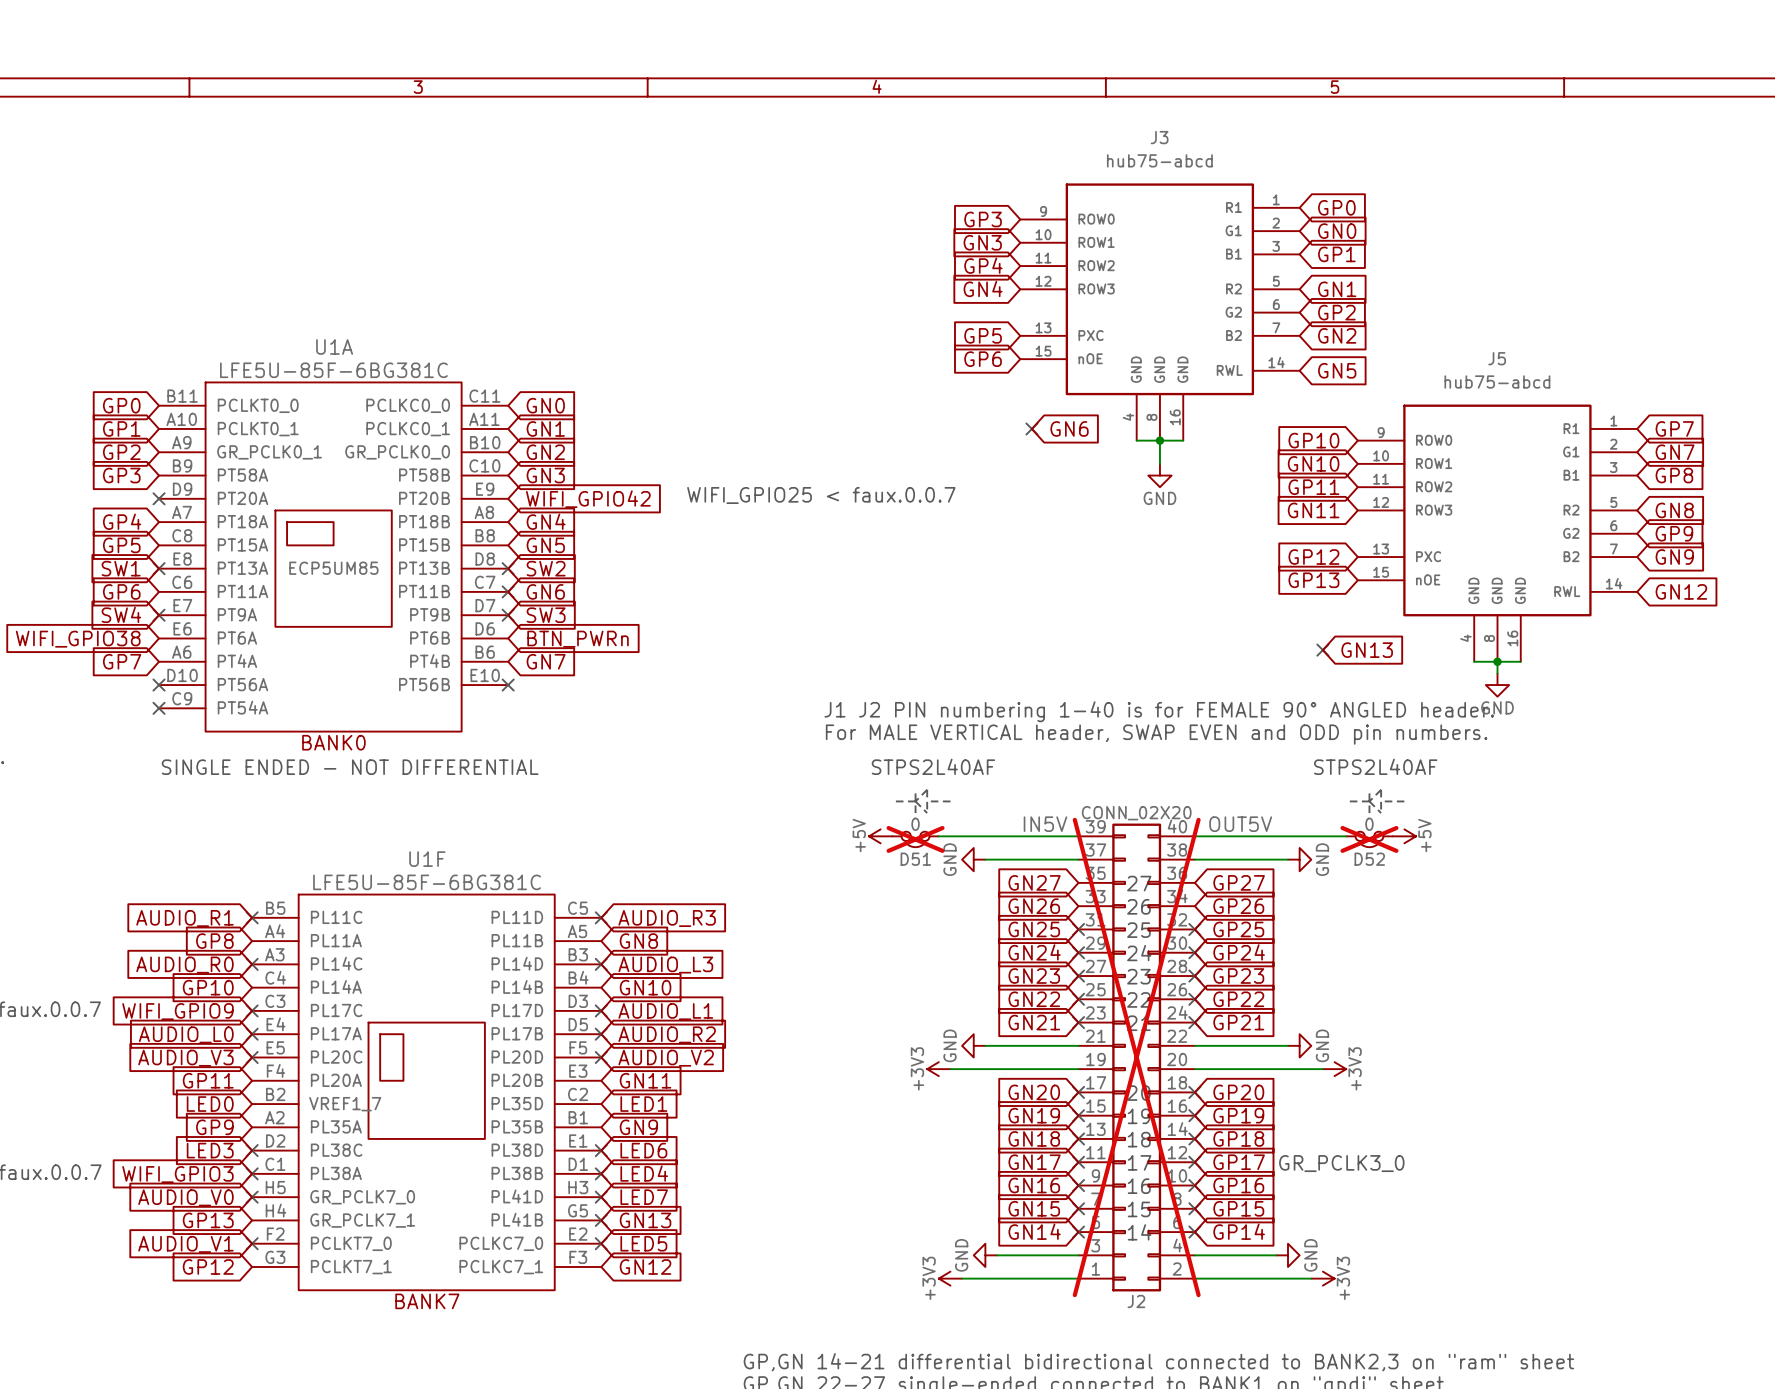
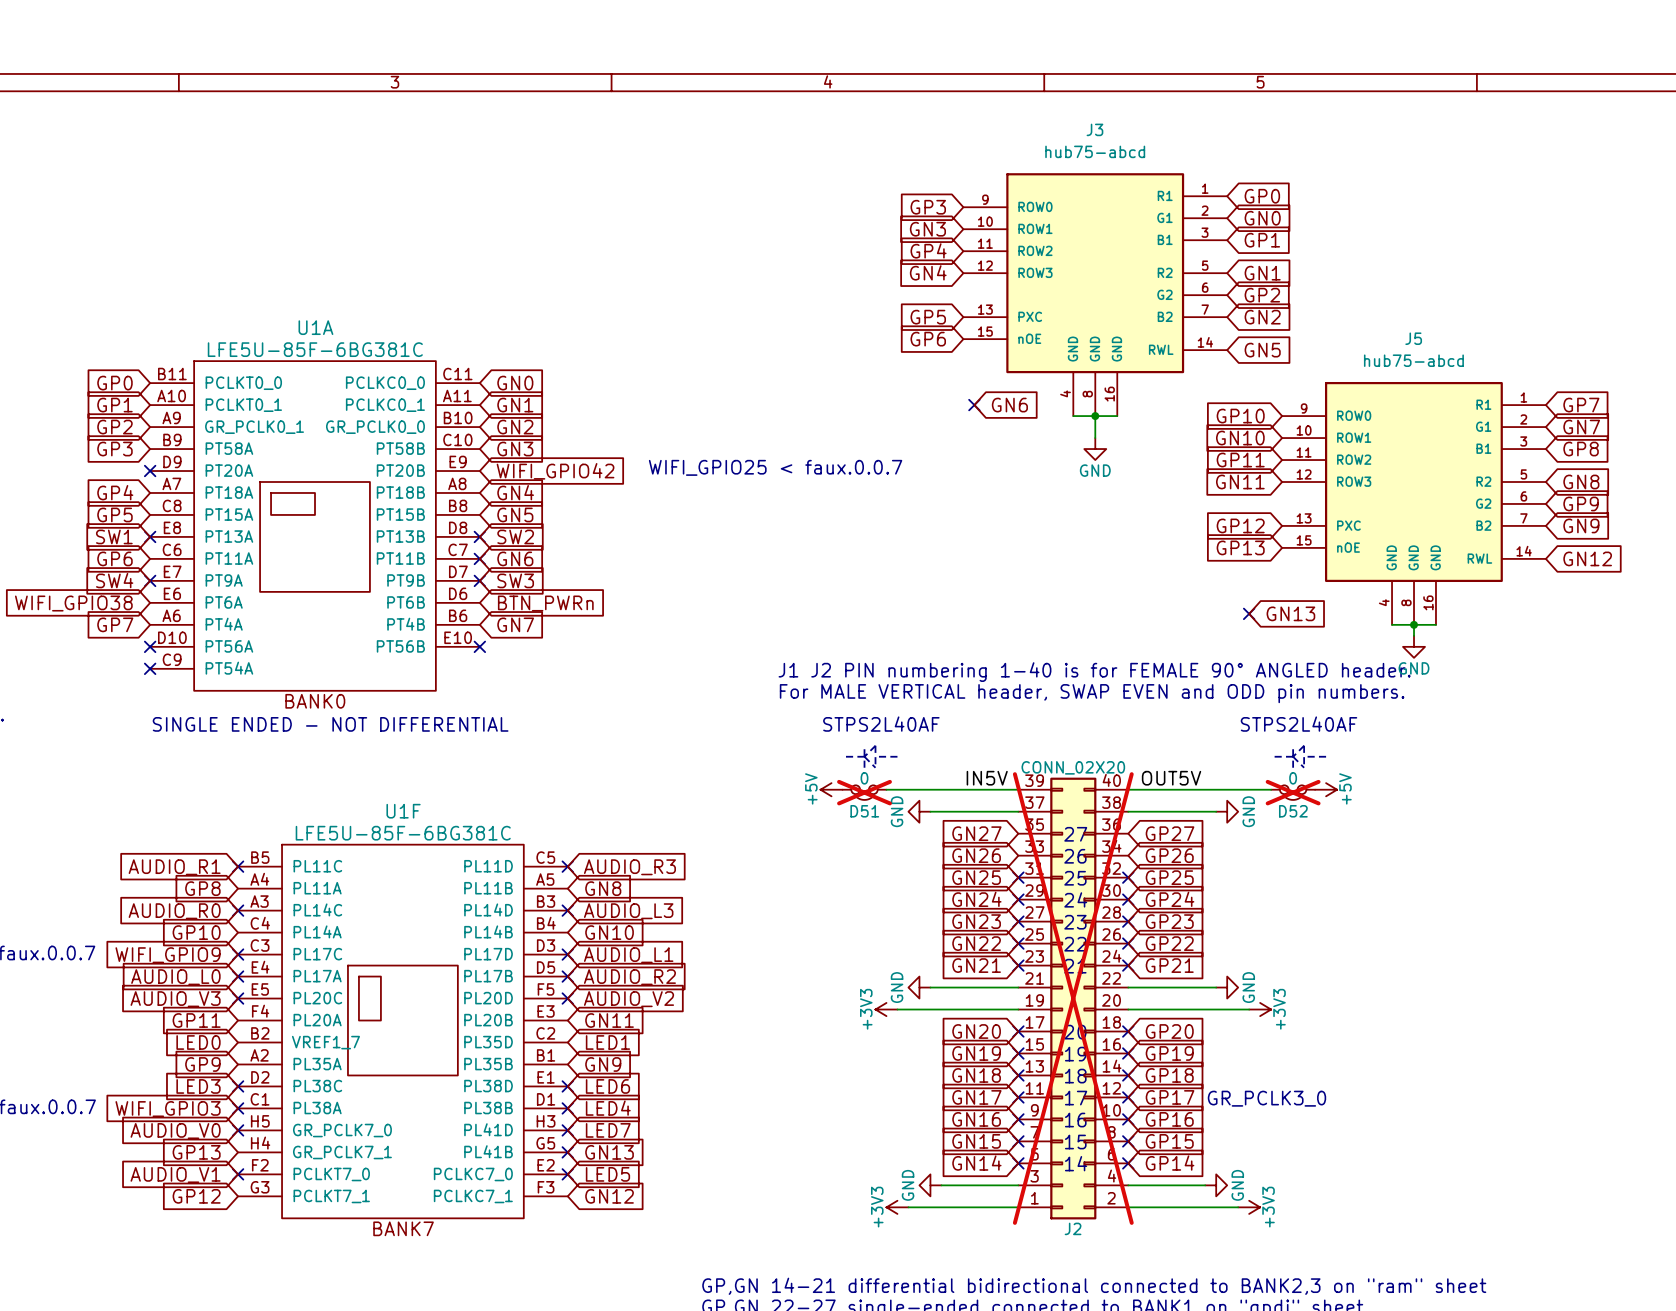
U1A text: ECP5UM85 (333, 568) -> none

